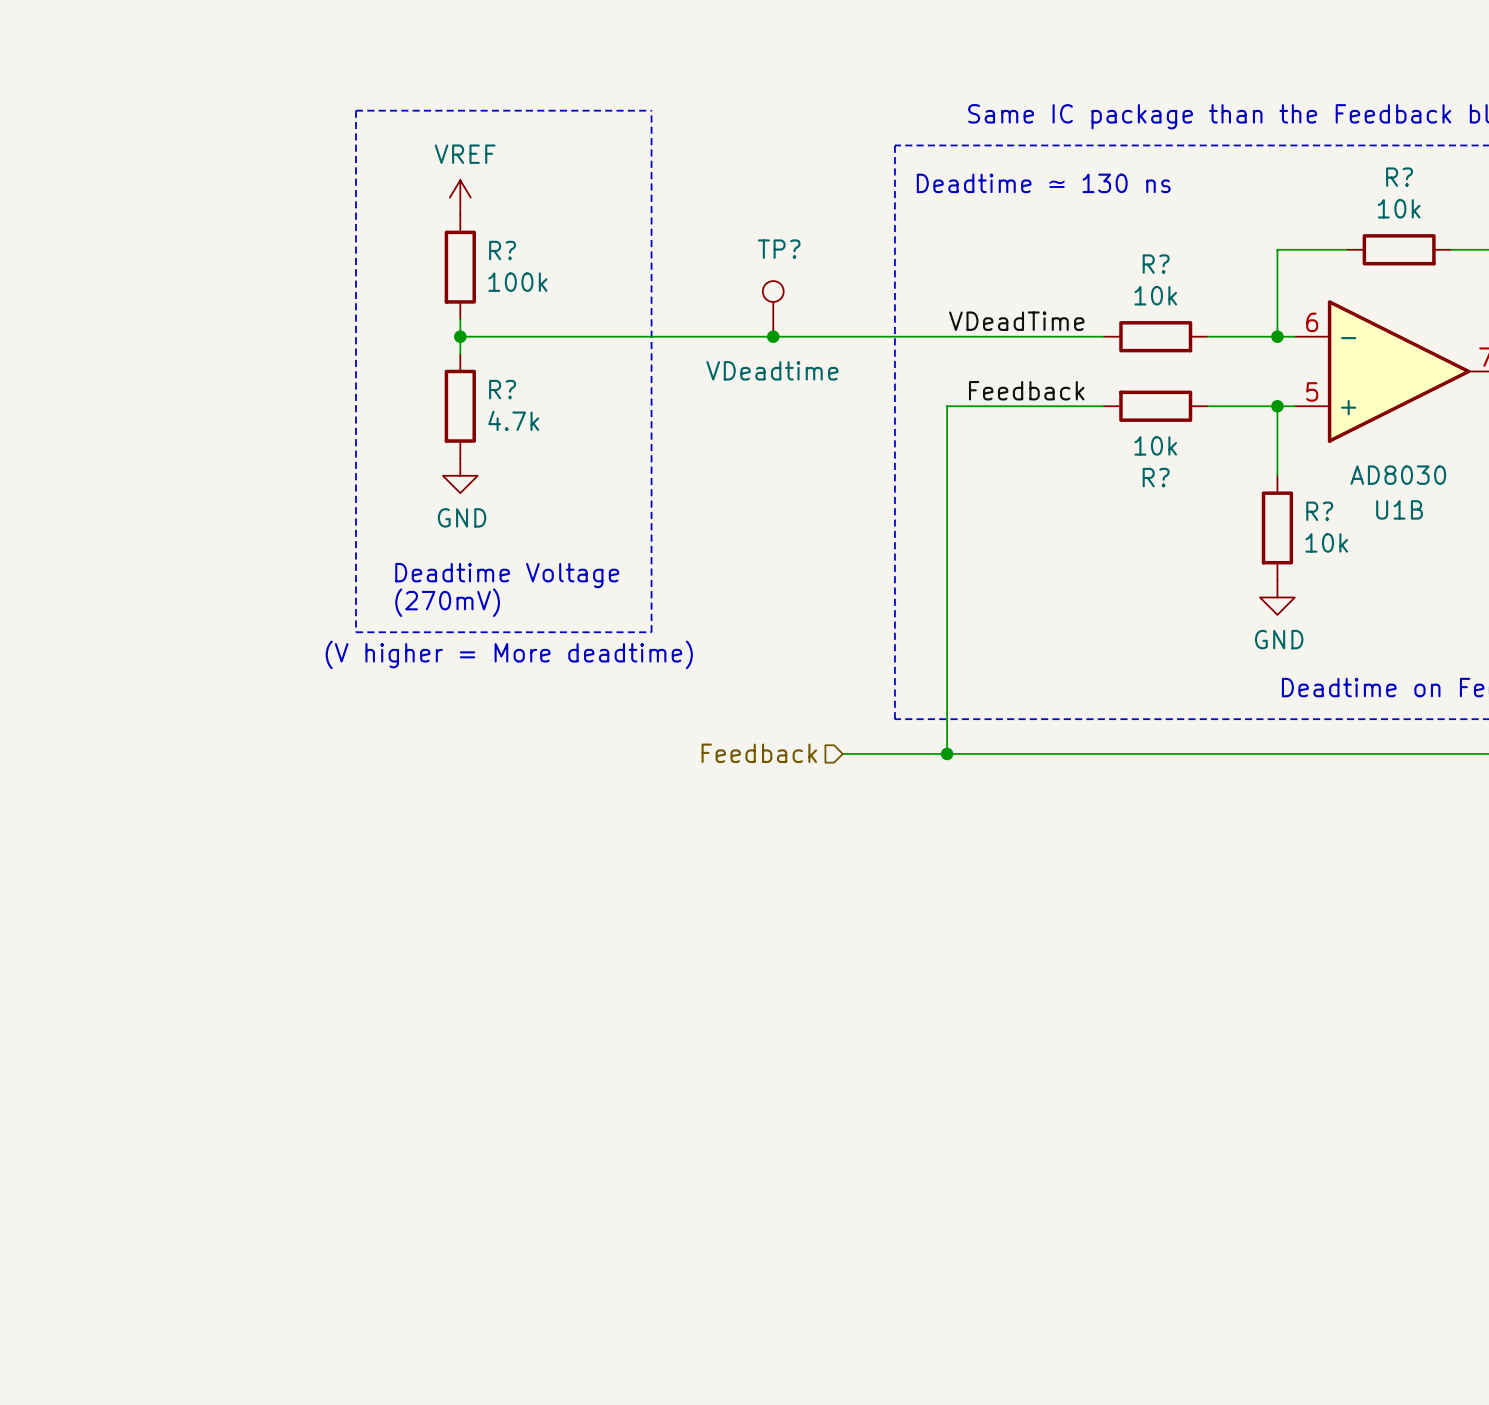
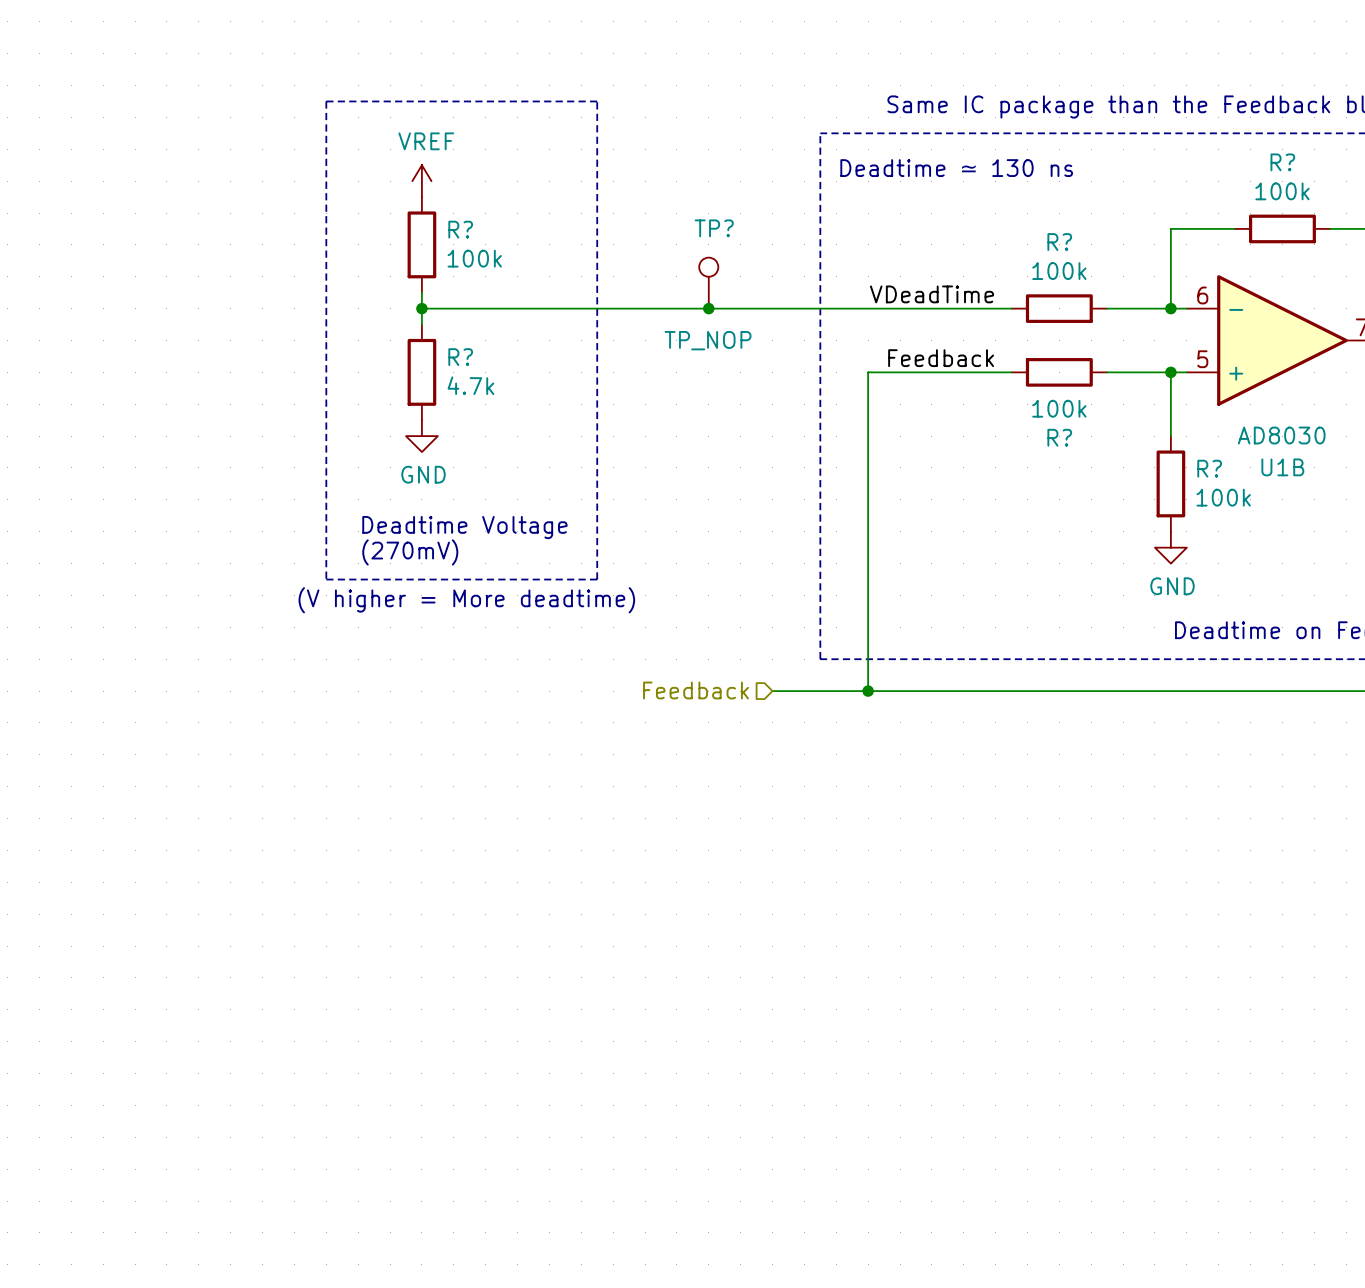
R? value: 10k (1399, 208) -> 100k (1282, 191)
R? value: 10k (1155, 295) -> 100k (1059, 271)
TP? value: VDeadtime (772, 370) -> TP_NOP (708, 340)
R? value: 10k (1155, 445) -> 100k (1059, 408)
R? value: 10k (1326, 542) -> 100k (1223, 497)

